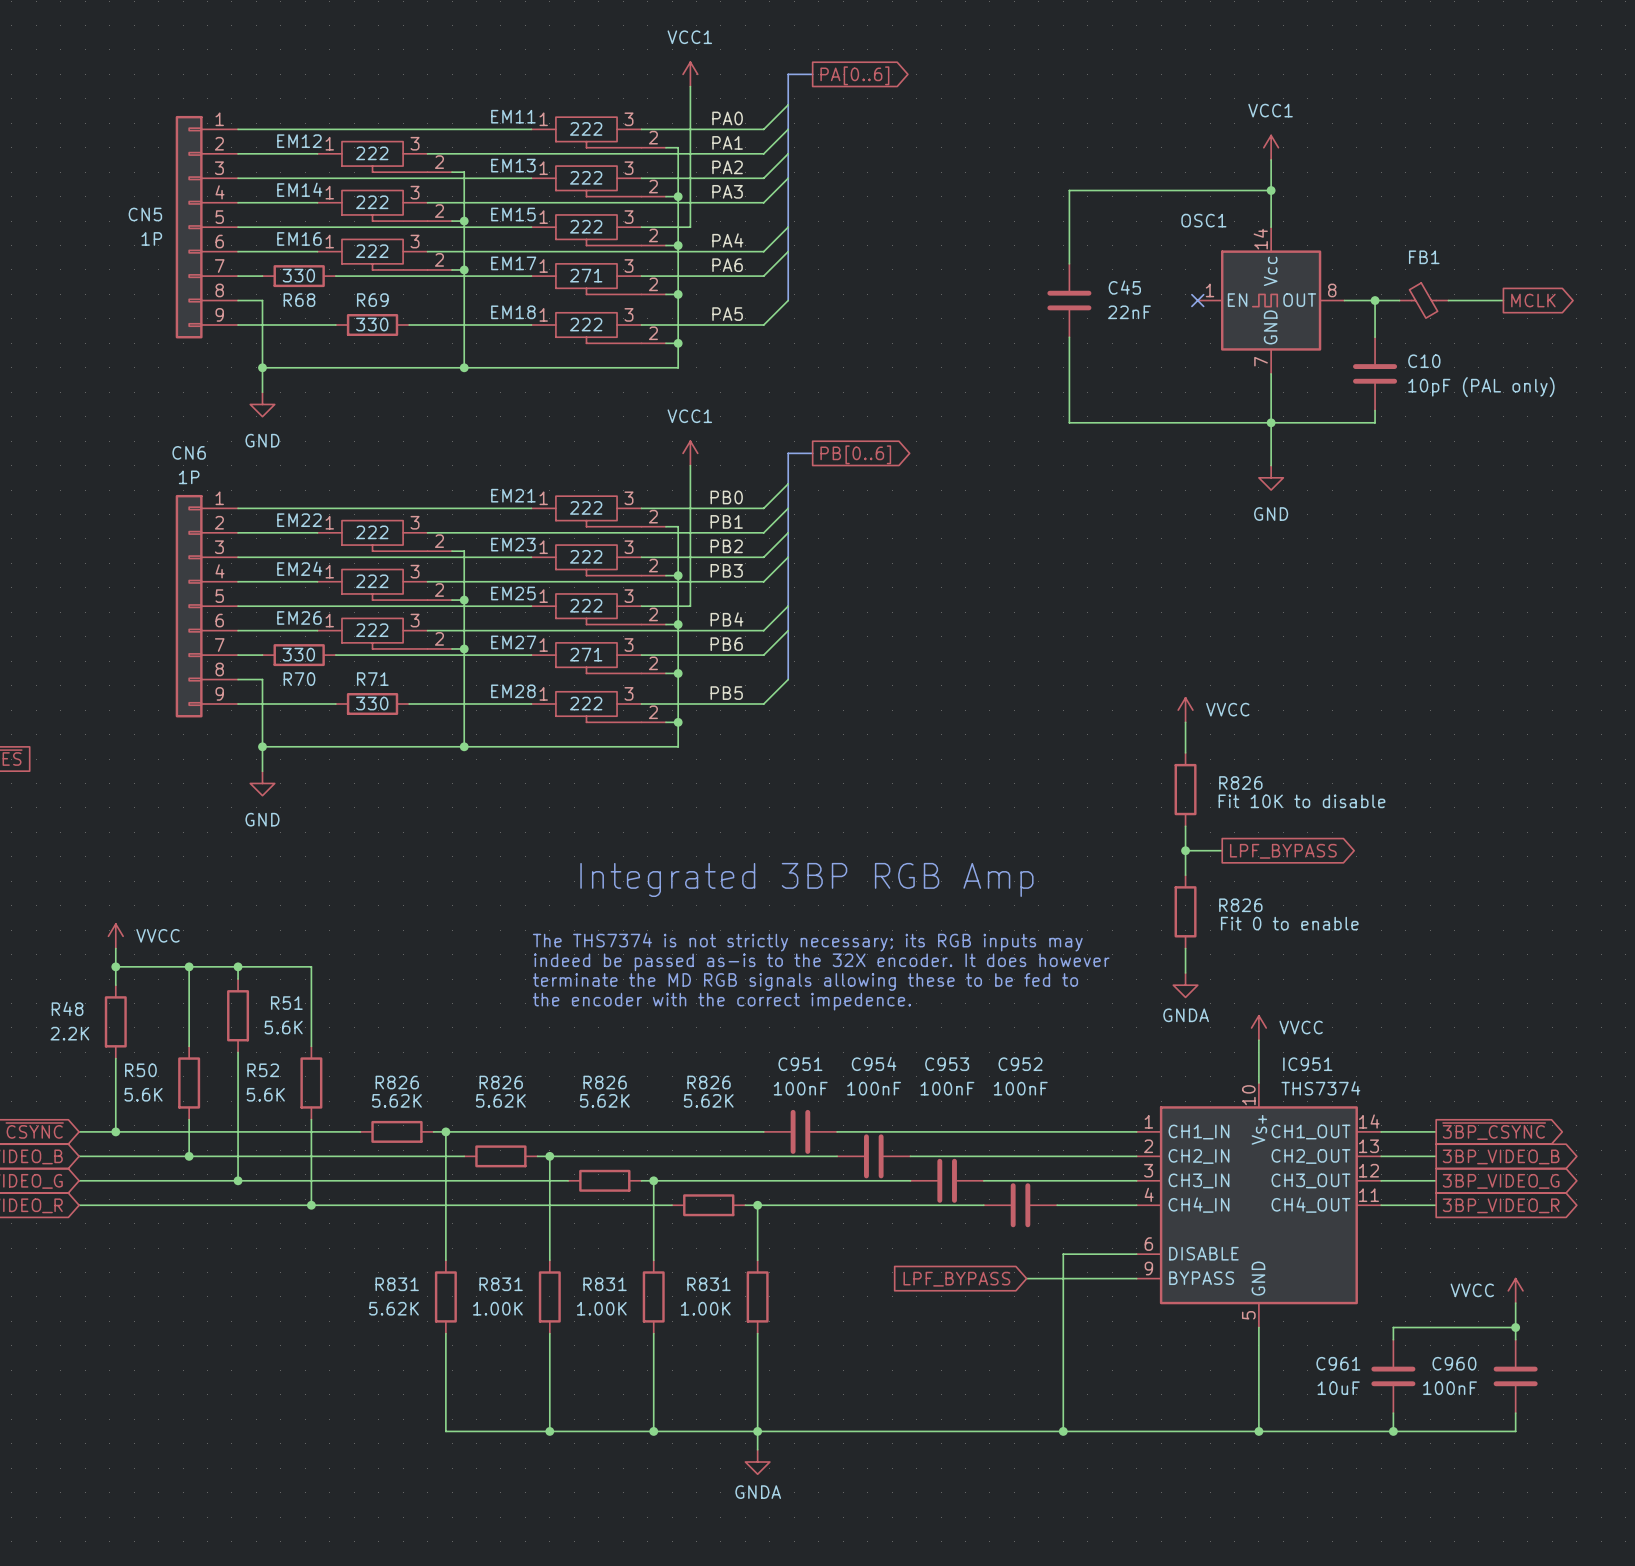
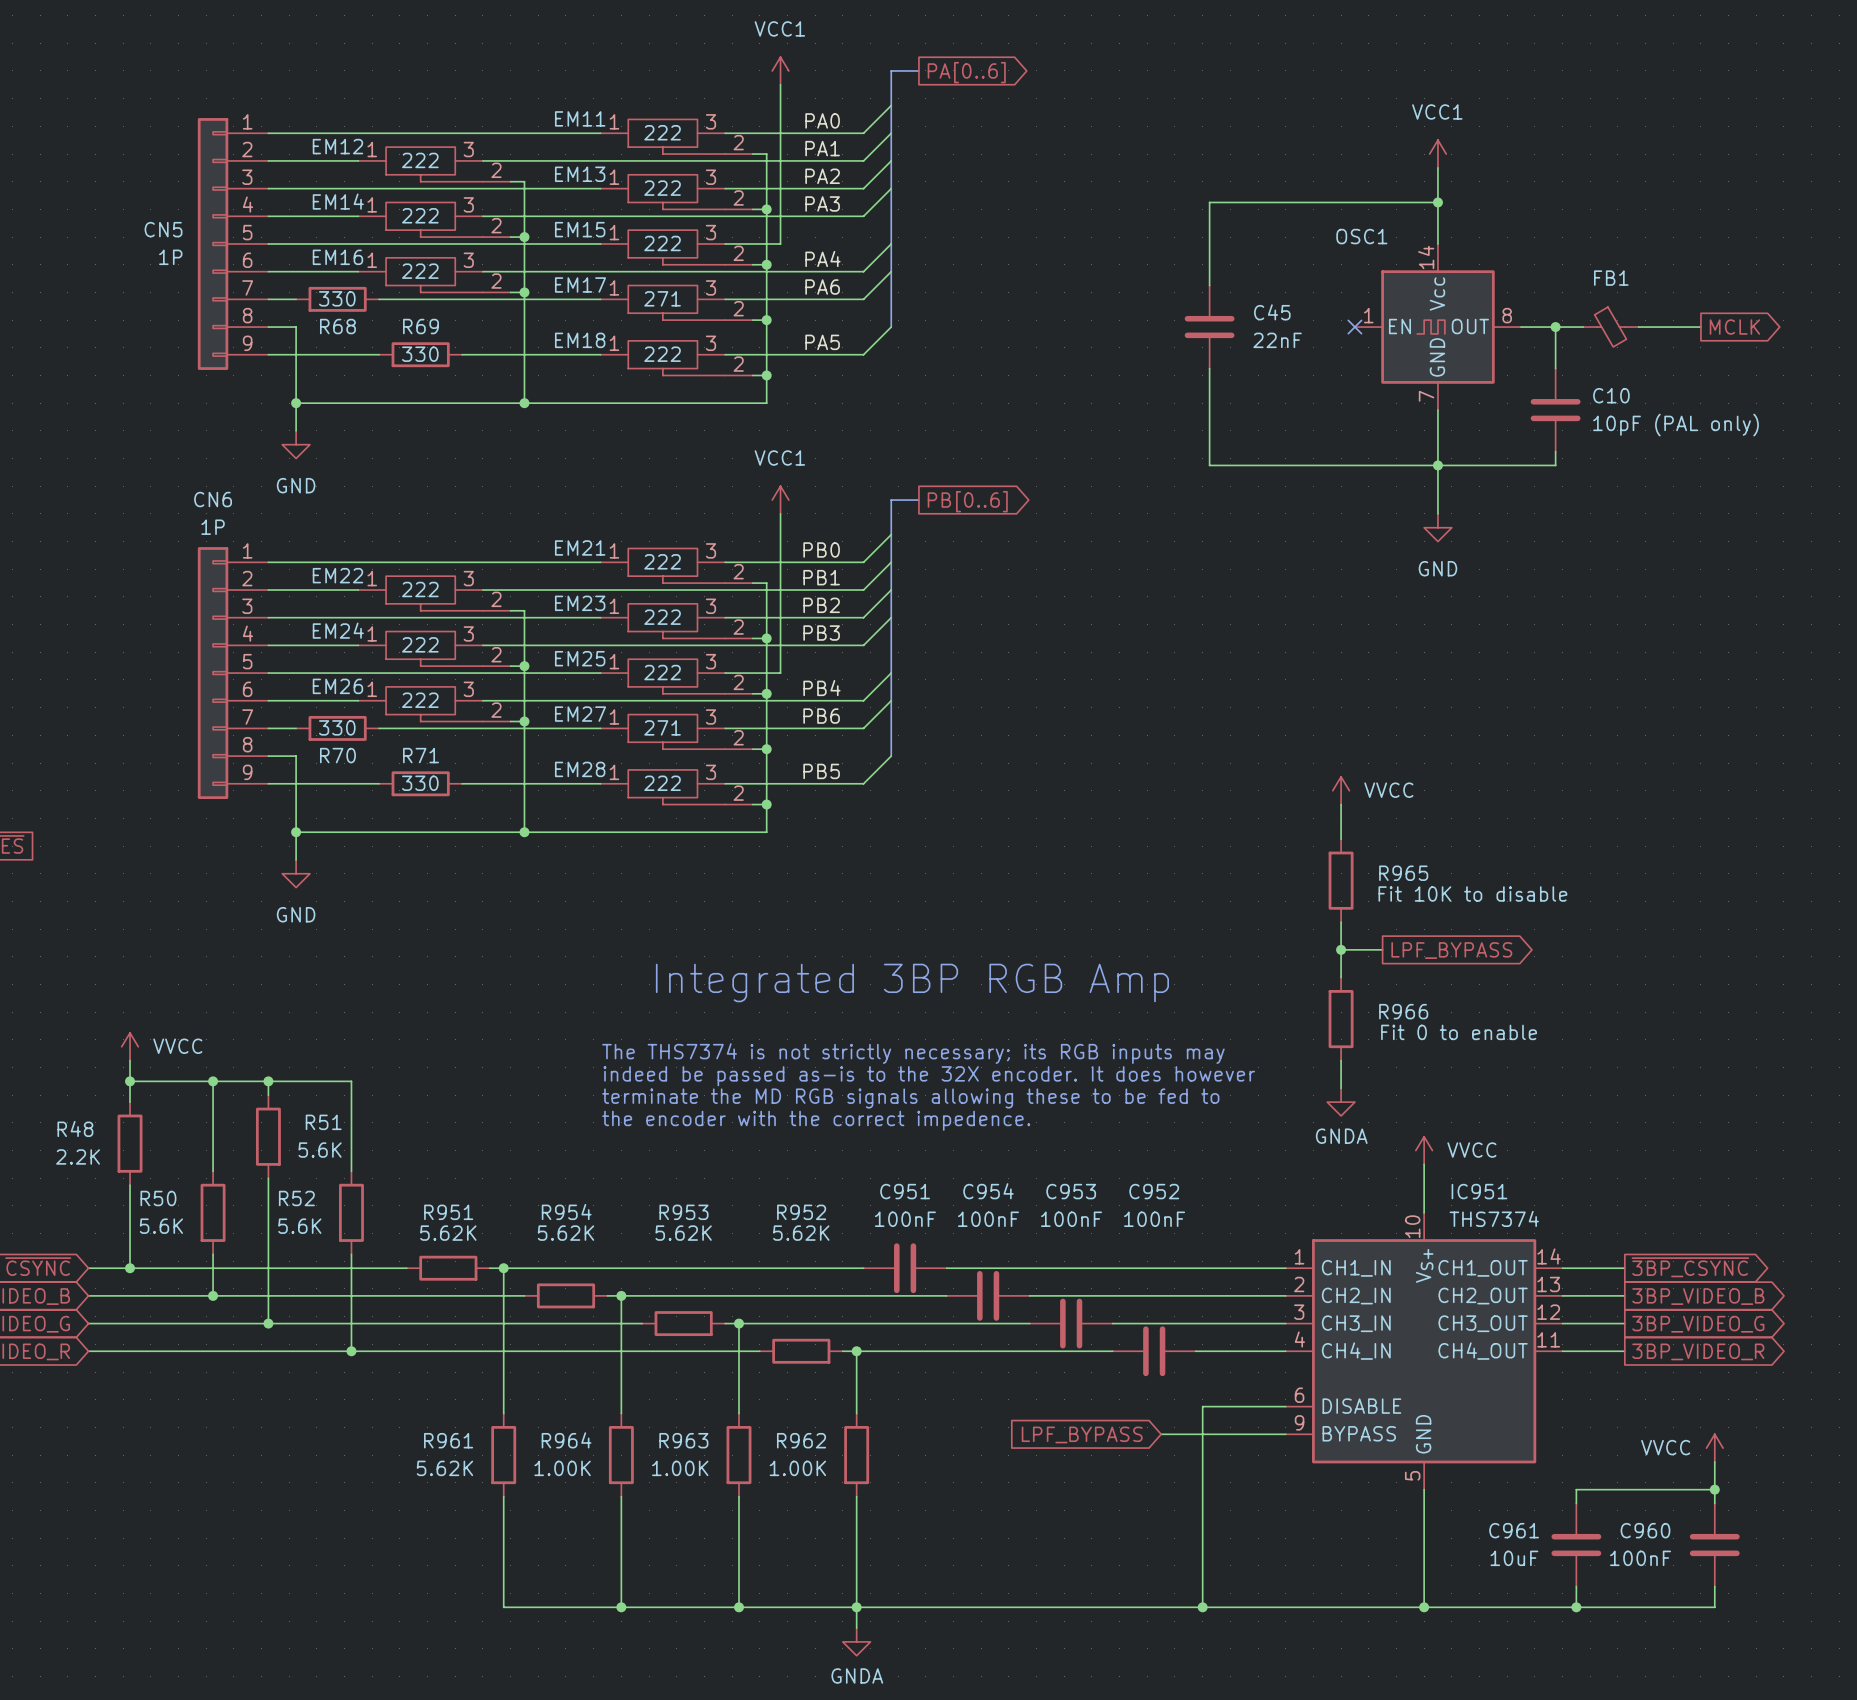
R826 name: R826 (1240, 783) -> R965 (1403, 873)
R826 name: R826 (1240, 905) -> R966 (1403, 1011)
R826 name: R826 (397, 1082) -> R951 (448, 1212)
R826 name: R826 (501, 1082) -> R954 (566, 1212)
R826 name: R826 (605, 1082) -> R953 (683, 1212)
R826 name: R826 (709, 1082) -> R952 (801, 1212)
R831 name: R831 (397, 1284) -> R961 (448, 1440)
R831 name: R831 (501, 1284) -> R964 (566, 1440)
R831 name: R831 (605, 1284) -> R963 (683, 1440)
R831 name: R831 (708, 1284) -> R962 (801, 1440)

